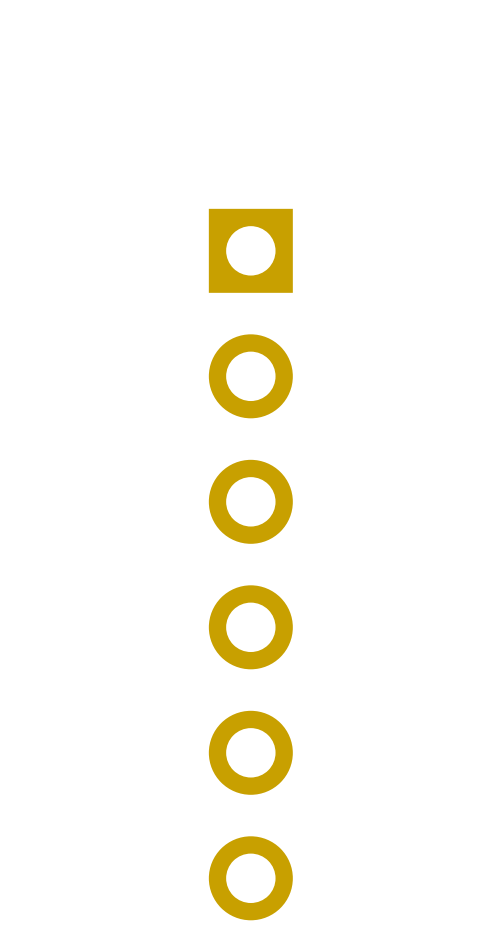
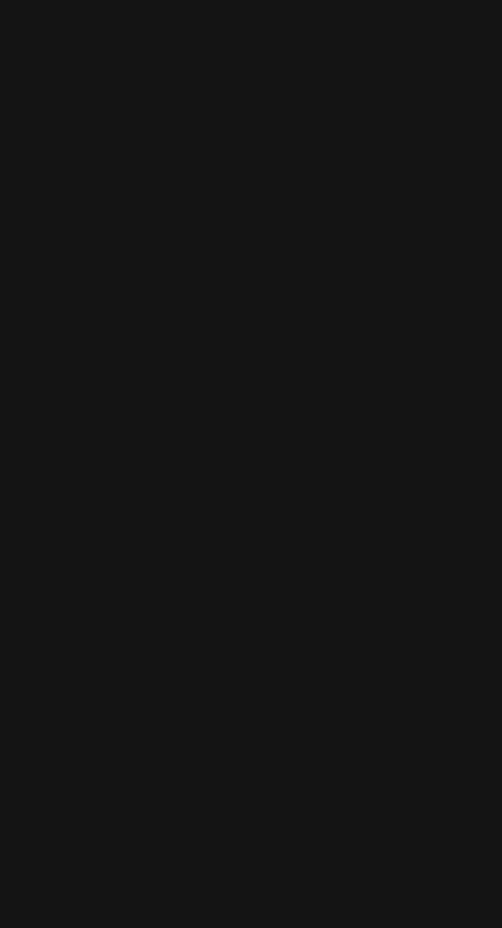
part: (250, 564) -> none

